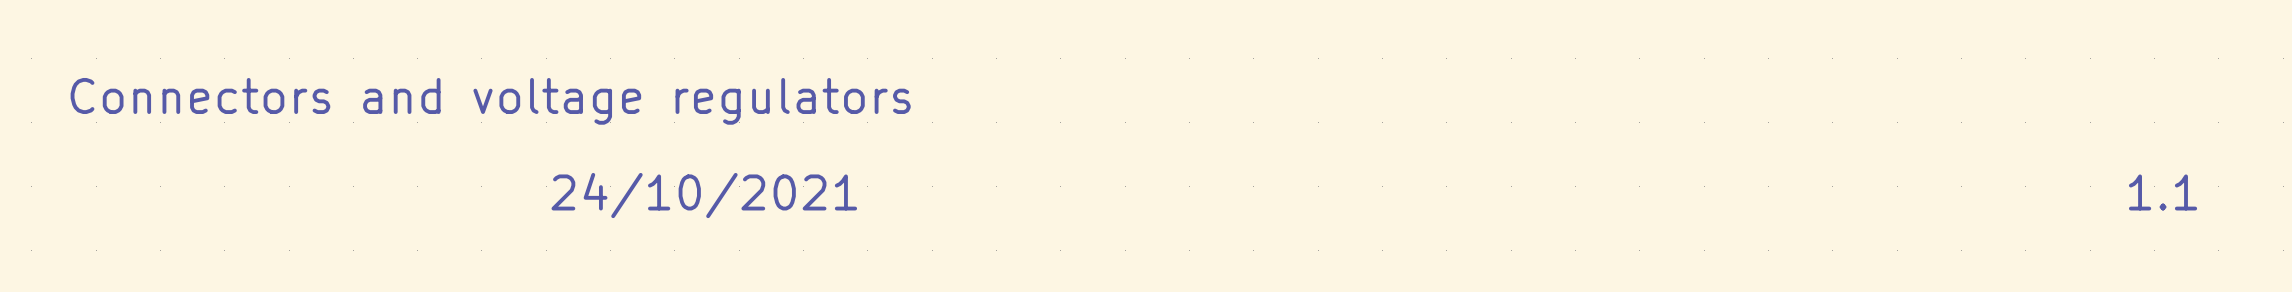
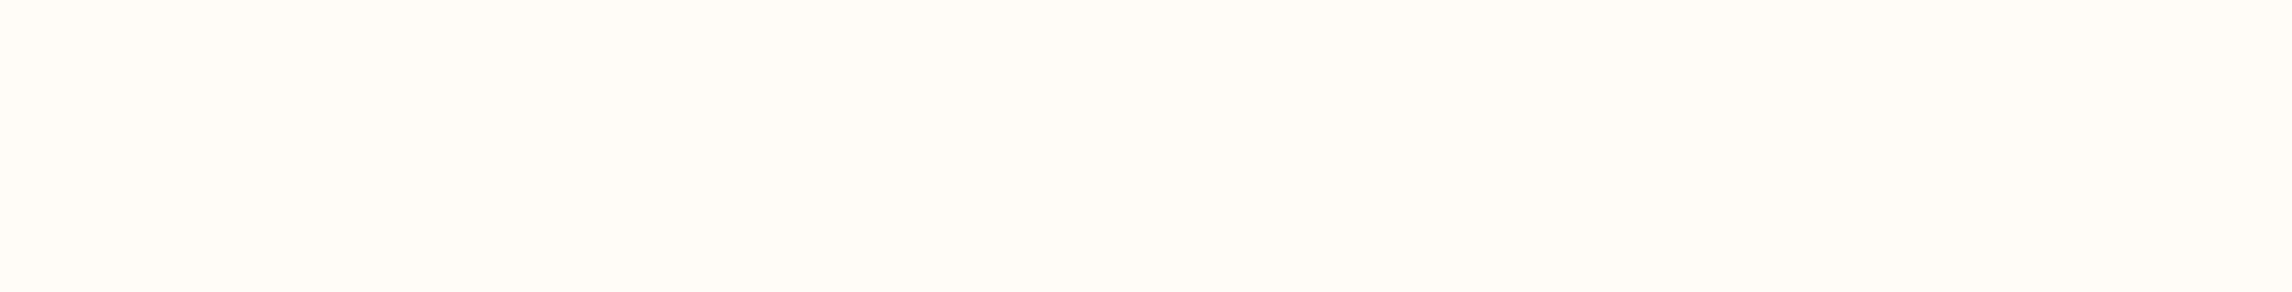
text: Connectors and voltage regulators (490, 101) -> none
text: 1.1 (2163, 192) -> none
text: 24/10/2021 (704, 195) -> none

